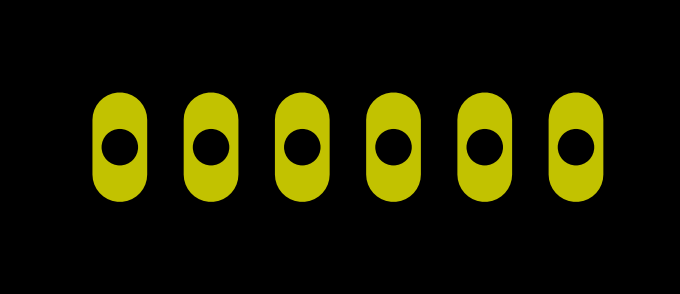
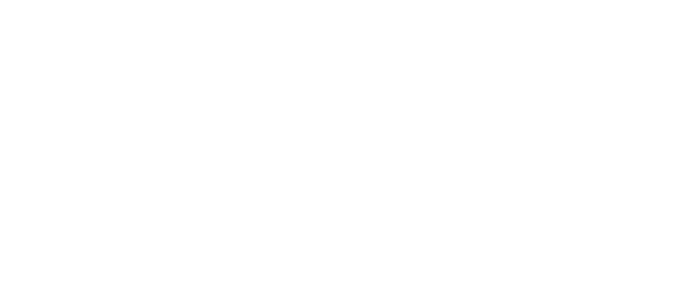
part: (347, 147) -> none

